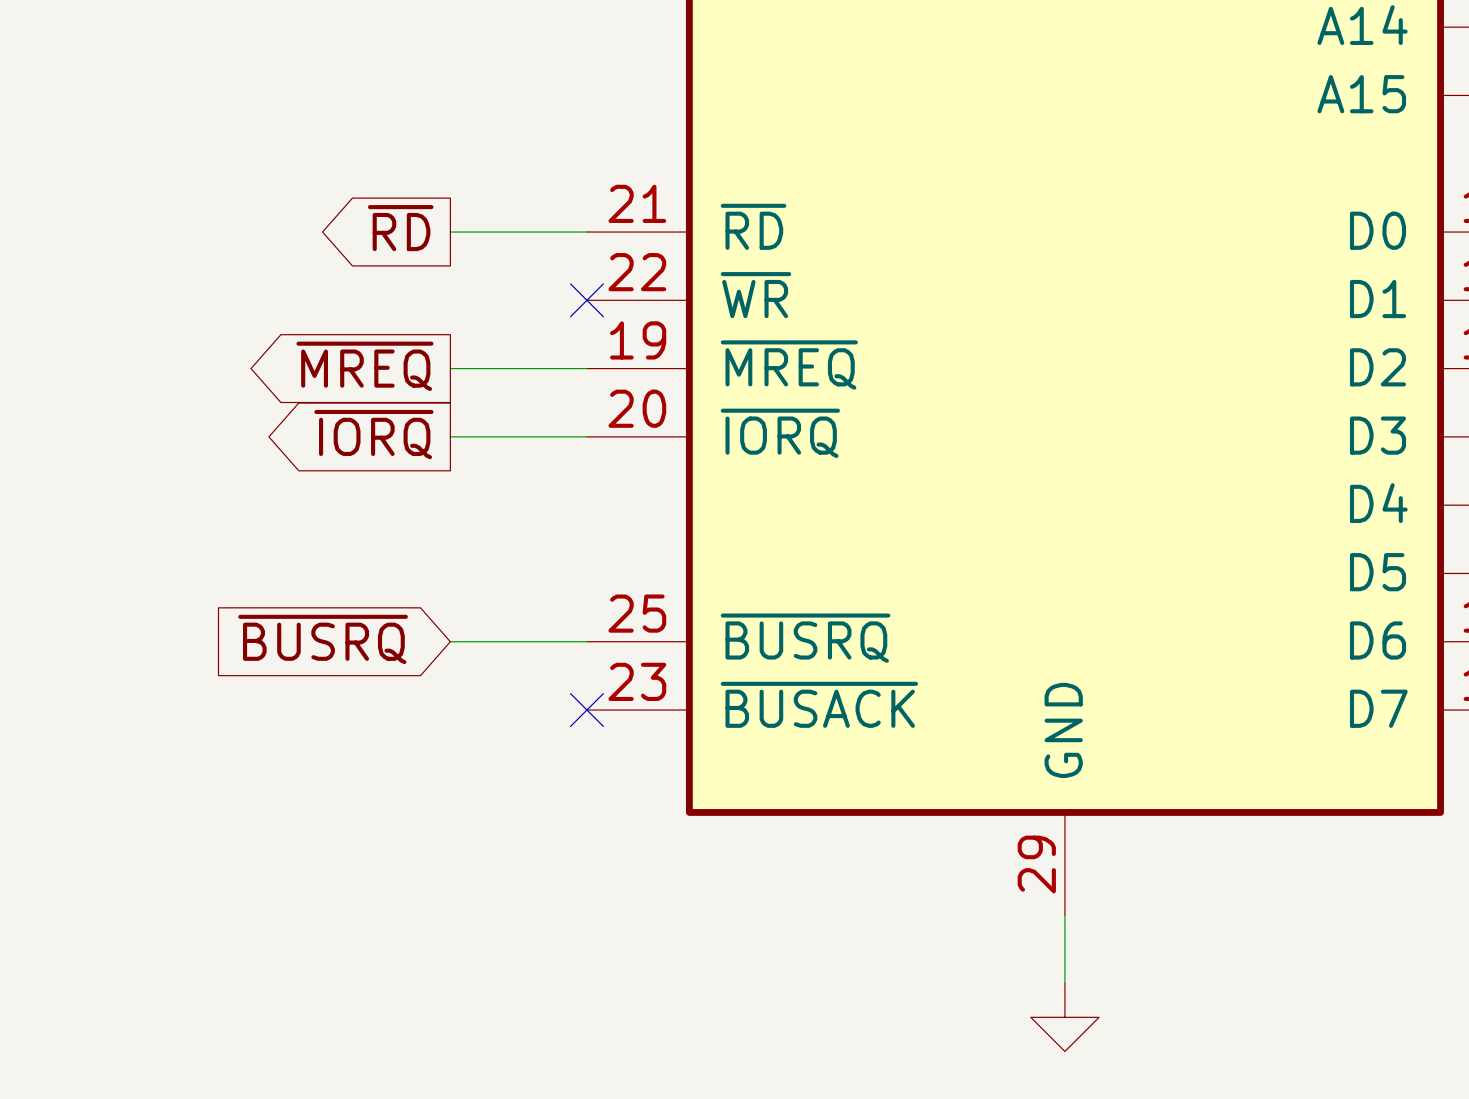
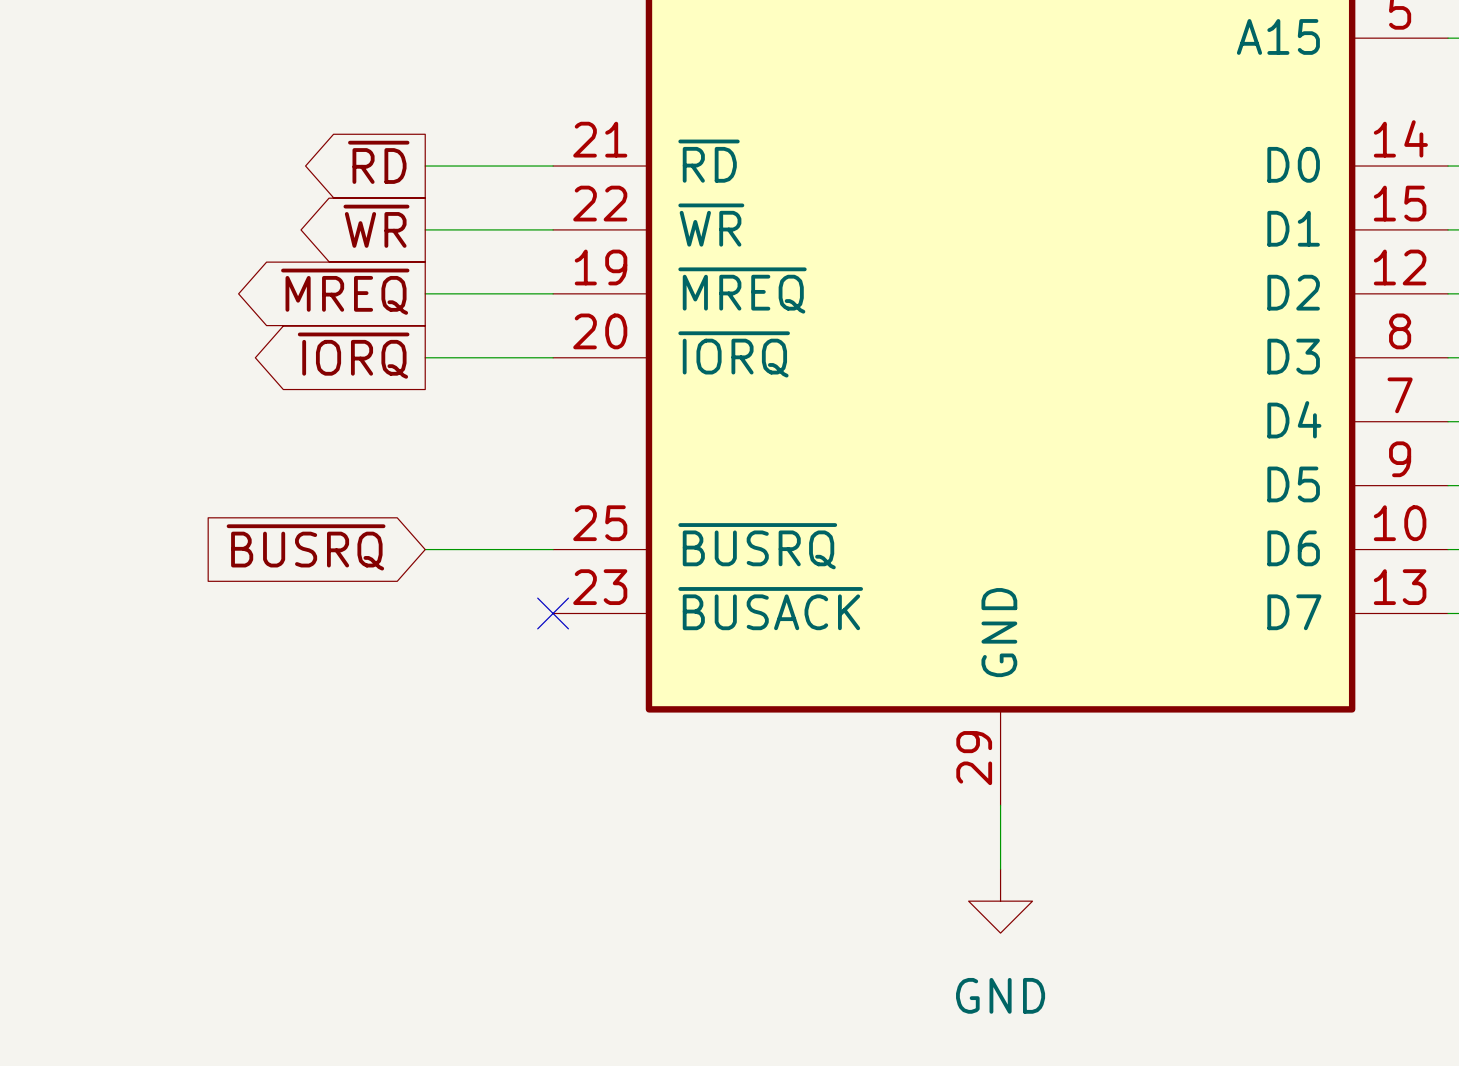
global label: none -> ~{WR} (376, 226)
wire: none -> (425, 229) (553, 229)
no-connect mark: (586, 300) -> none

